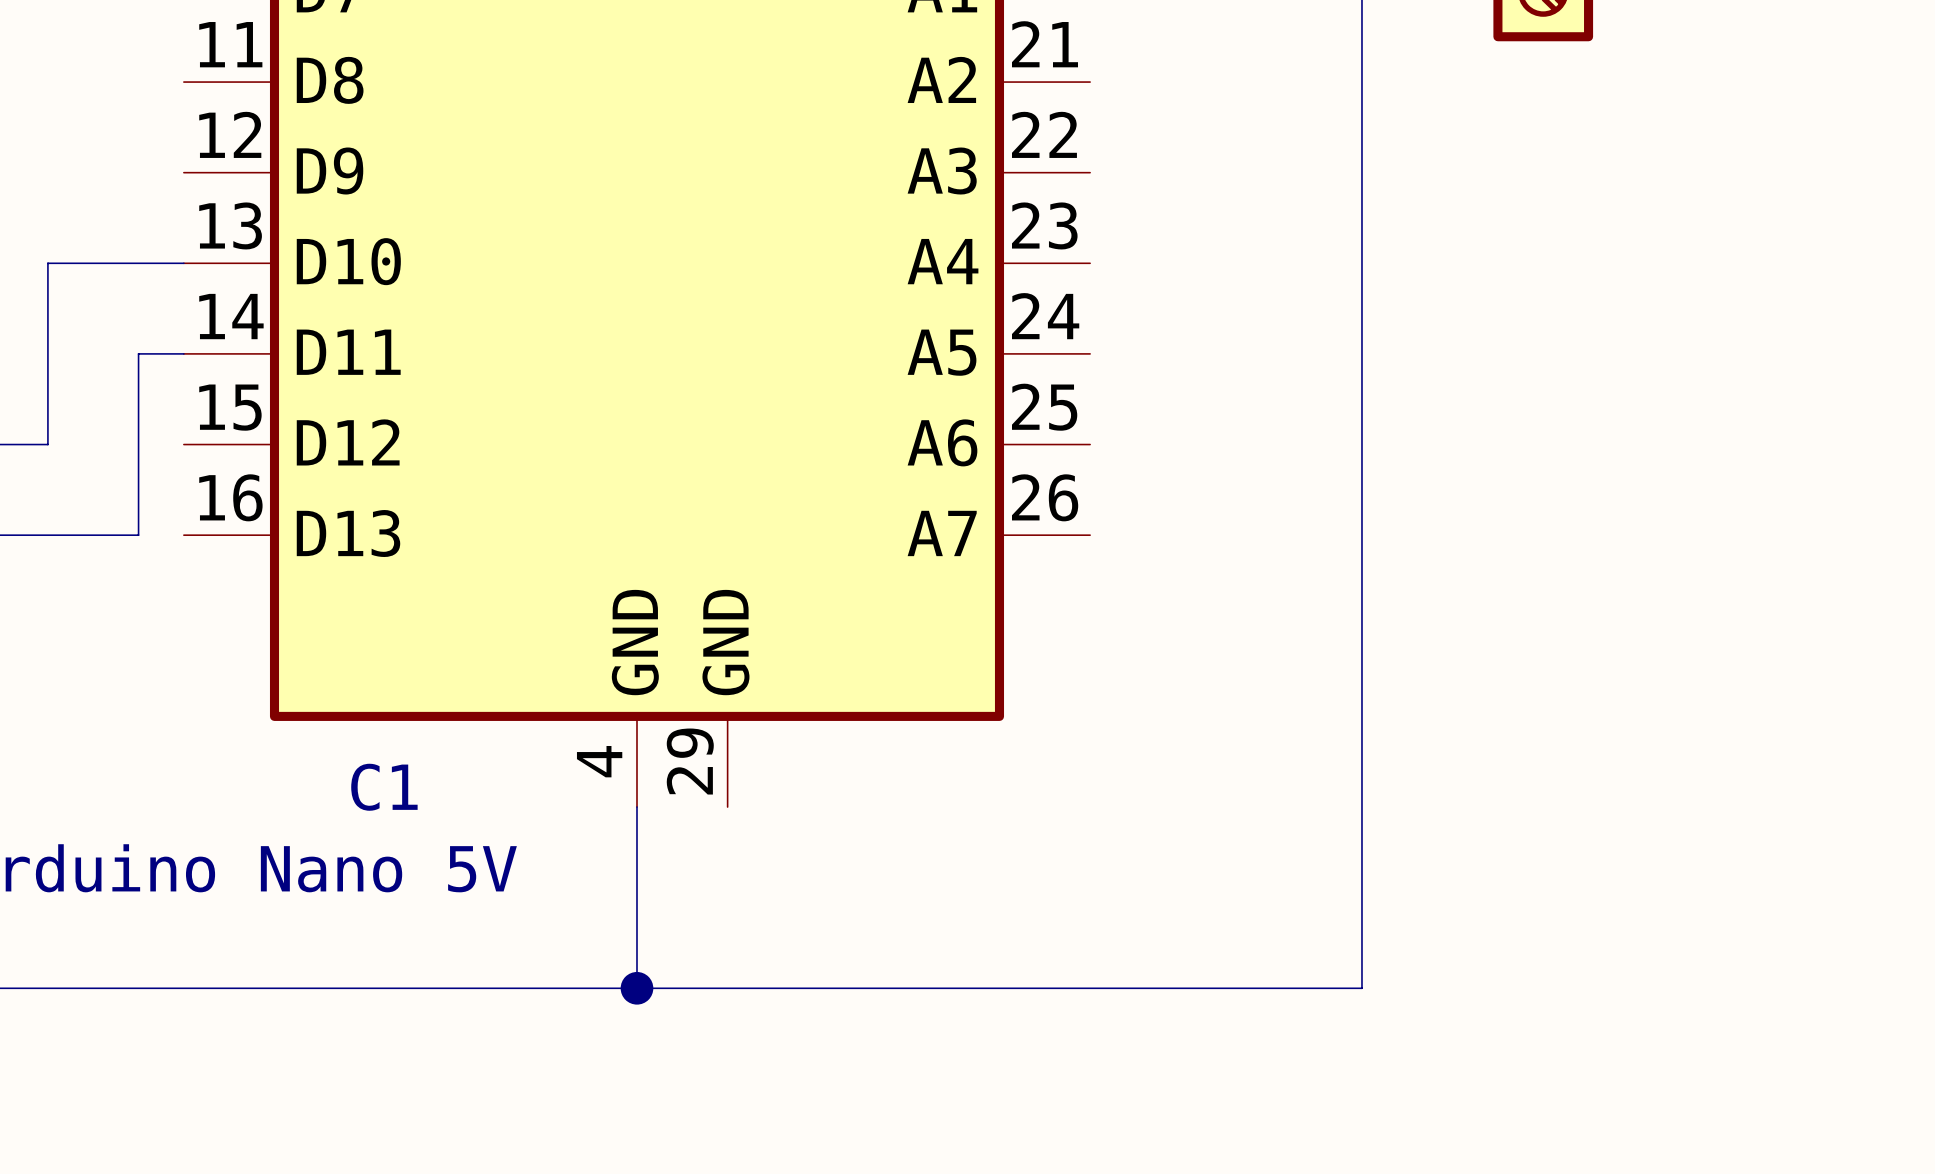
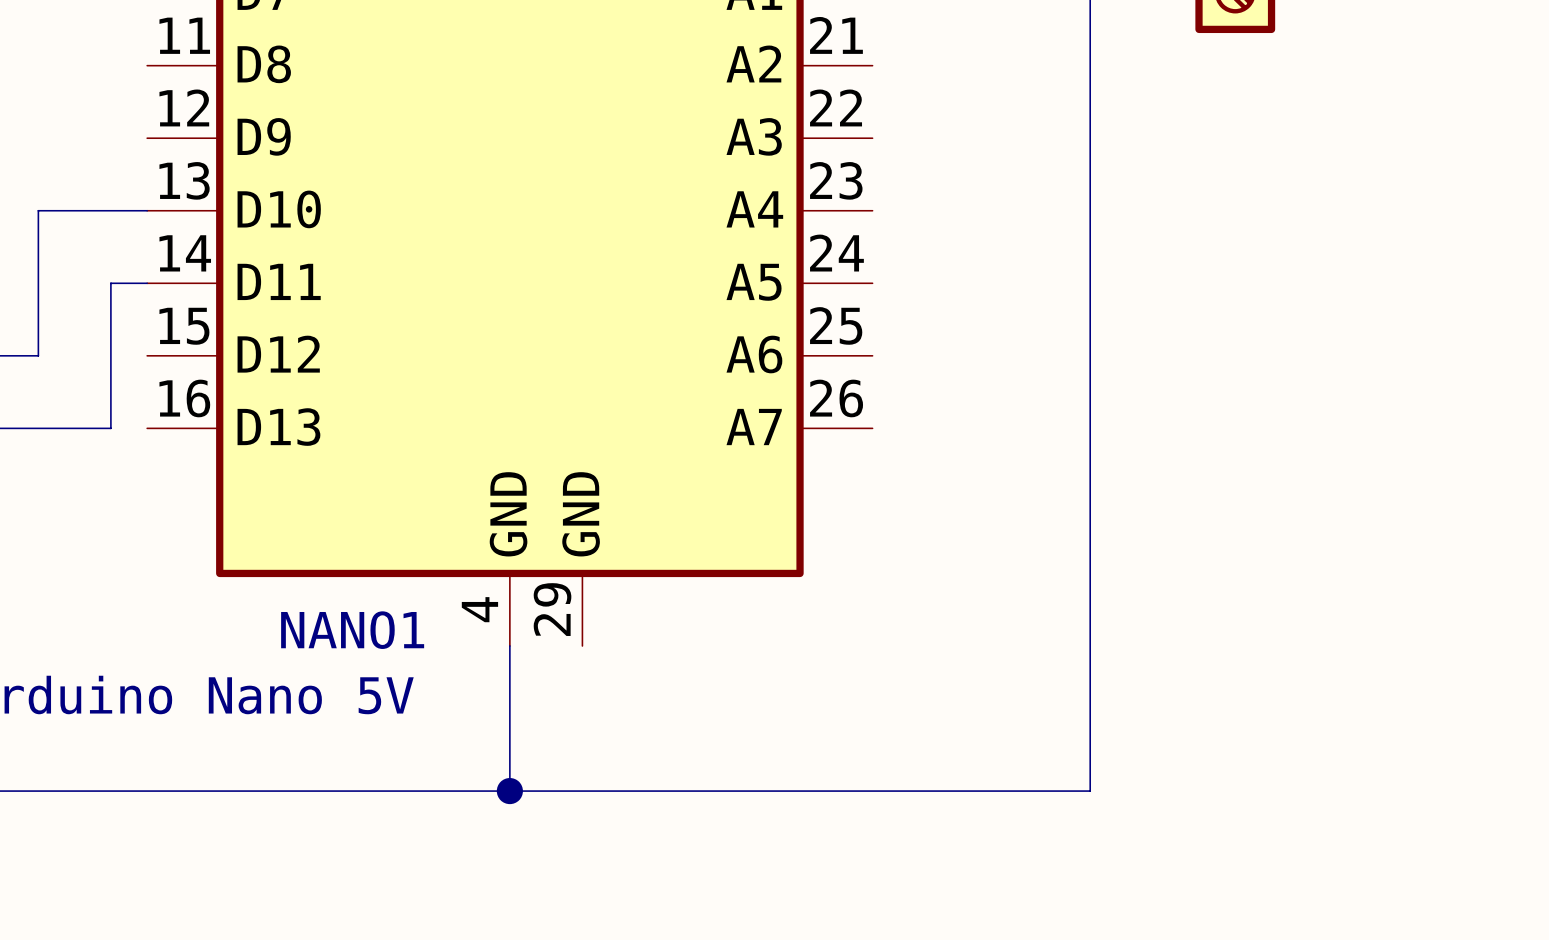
C1 name: C1 (384, 787) -> NANO1 (352, 630)

